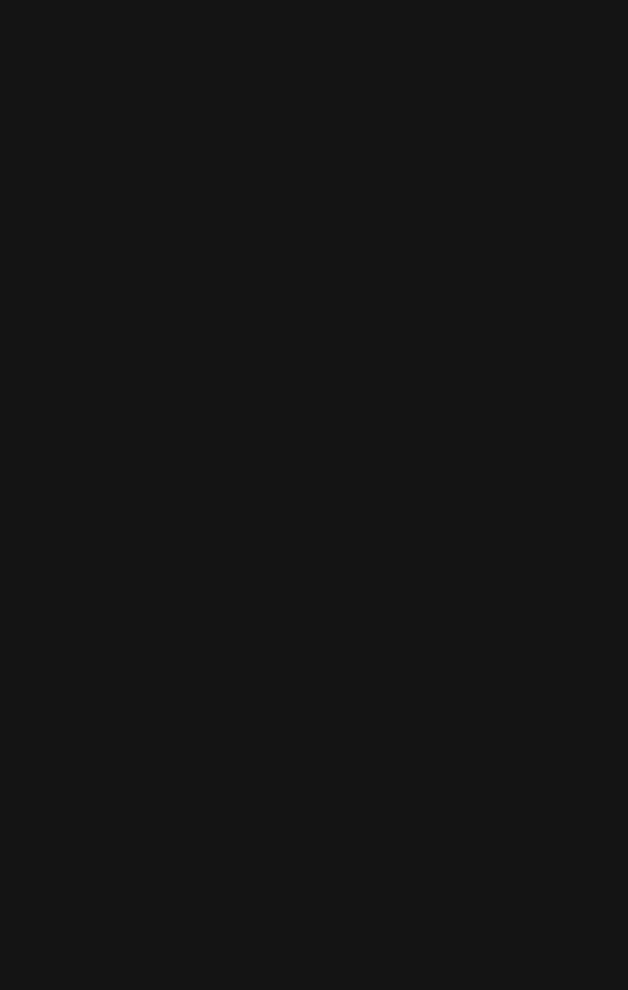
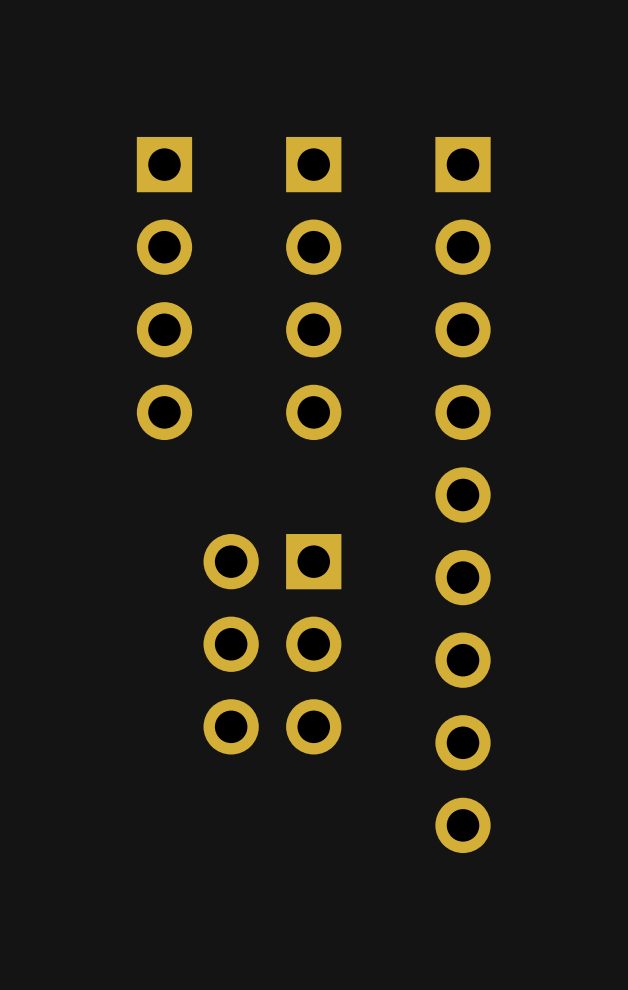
part: none -> (164, 288)
part: none -> (313, 288)
part: none -> (463, 494)
part: none -> (272, 644)

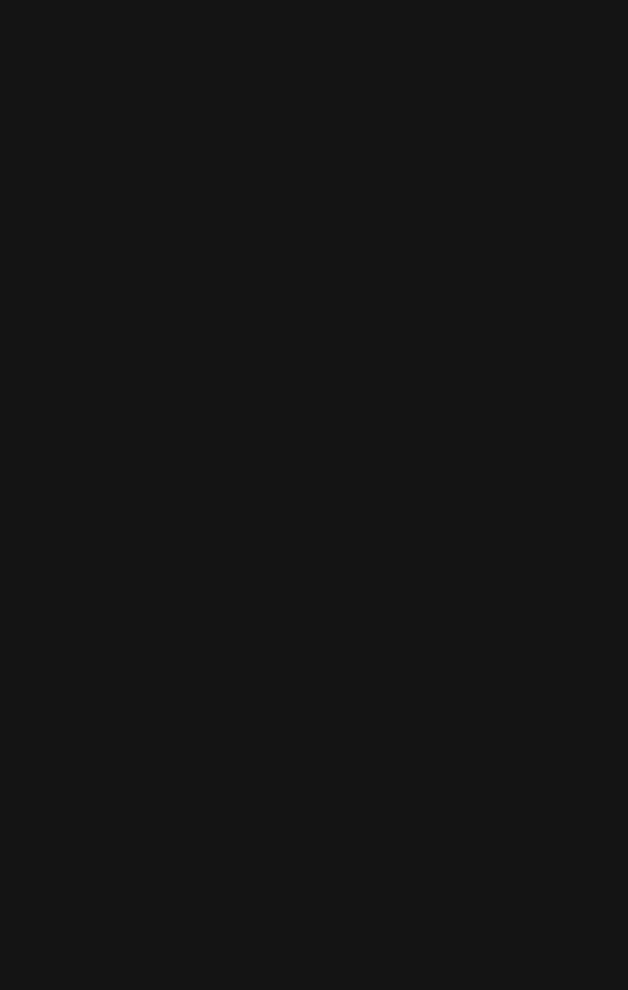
part: (164, 288) -> none
part: (313, 288) -> none
part: (463, 494) -> none
part: (272, 644) -> none

